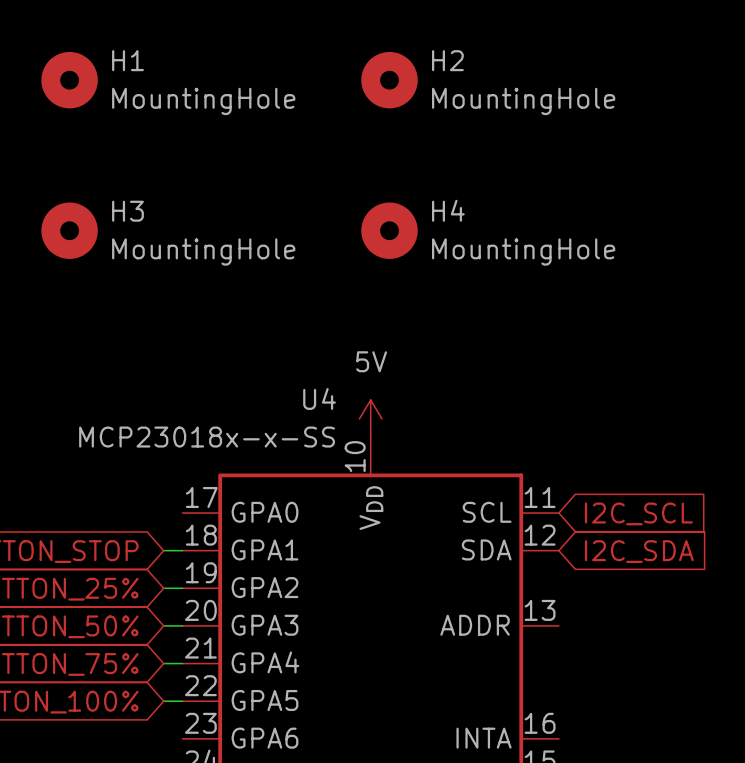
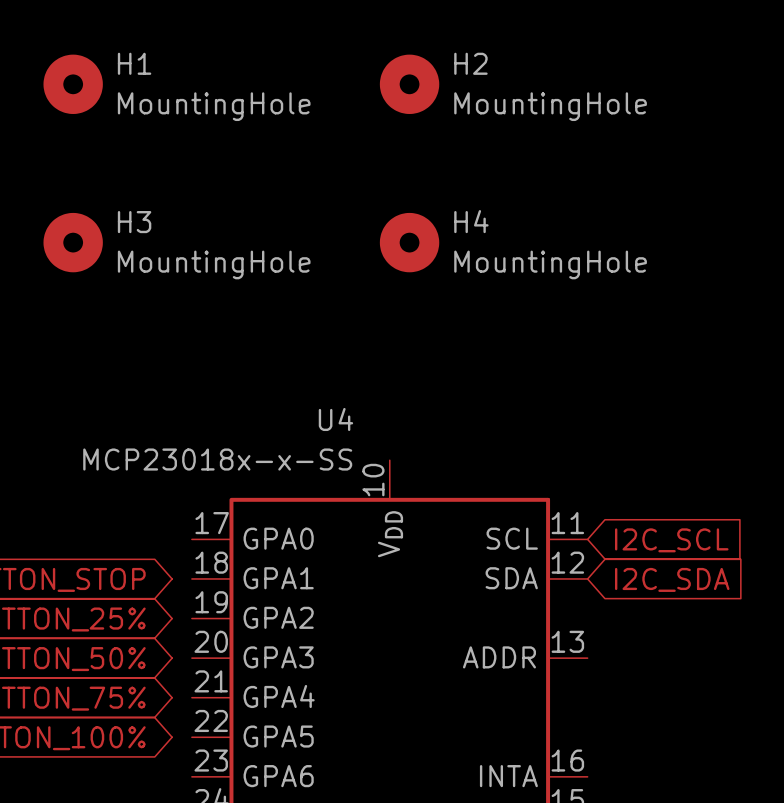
power symbol: 5V (370, 418) -> none
wire: (163, 550) (182, 550) -> none
wire: (163, 588) (182, 588) -> none
wire: (163, 625) (182, 625) -> none
wire: (163, 663) (182, 663) -> none
wire: (163, 701) (182, 701) -> none

